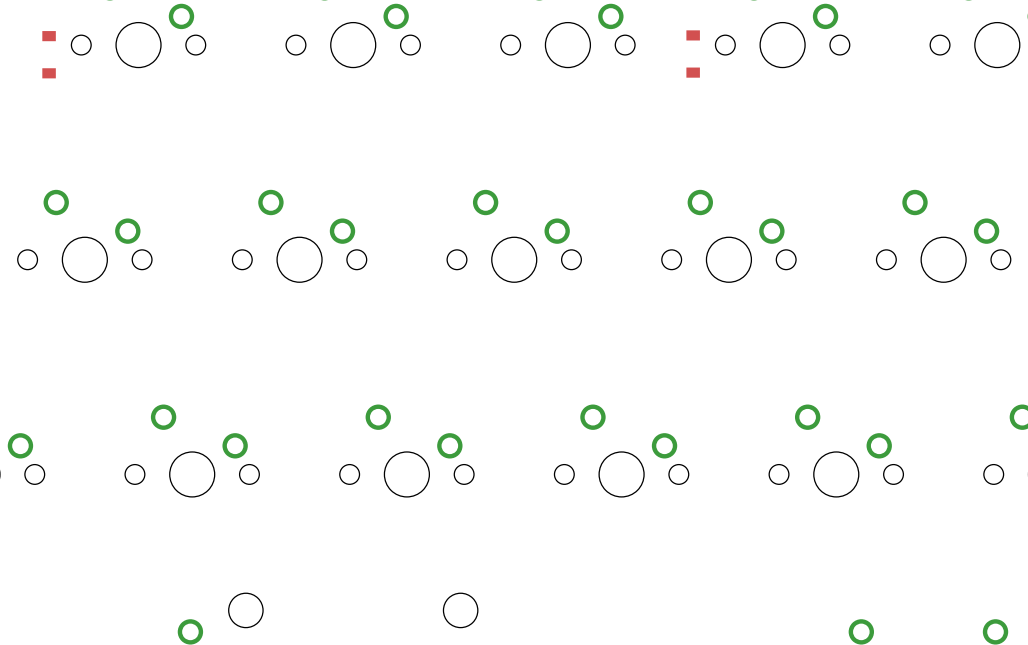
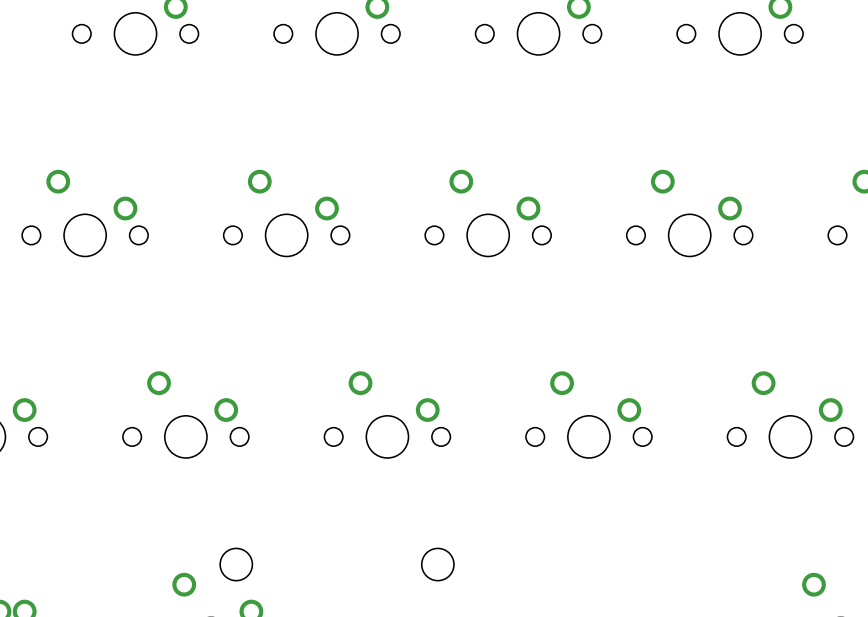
part: (49, 54) -> none
part: (693, 54) -> none

